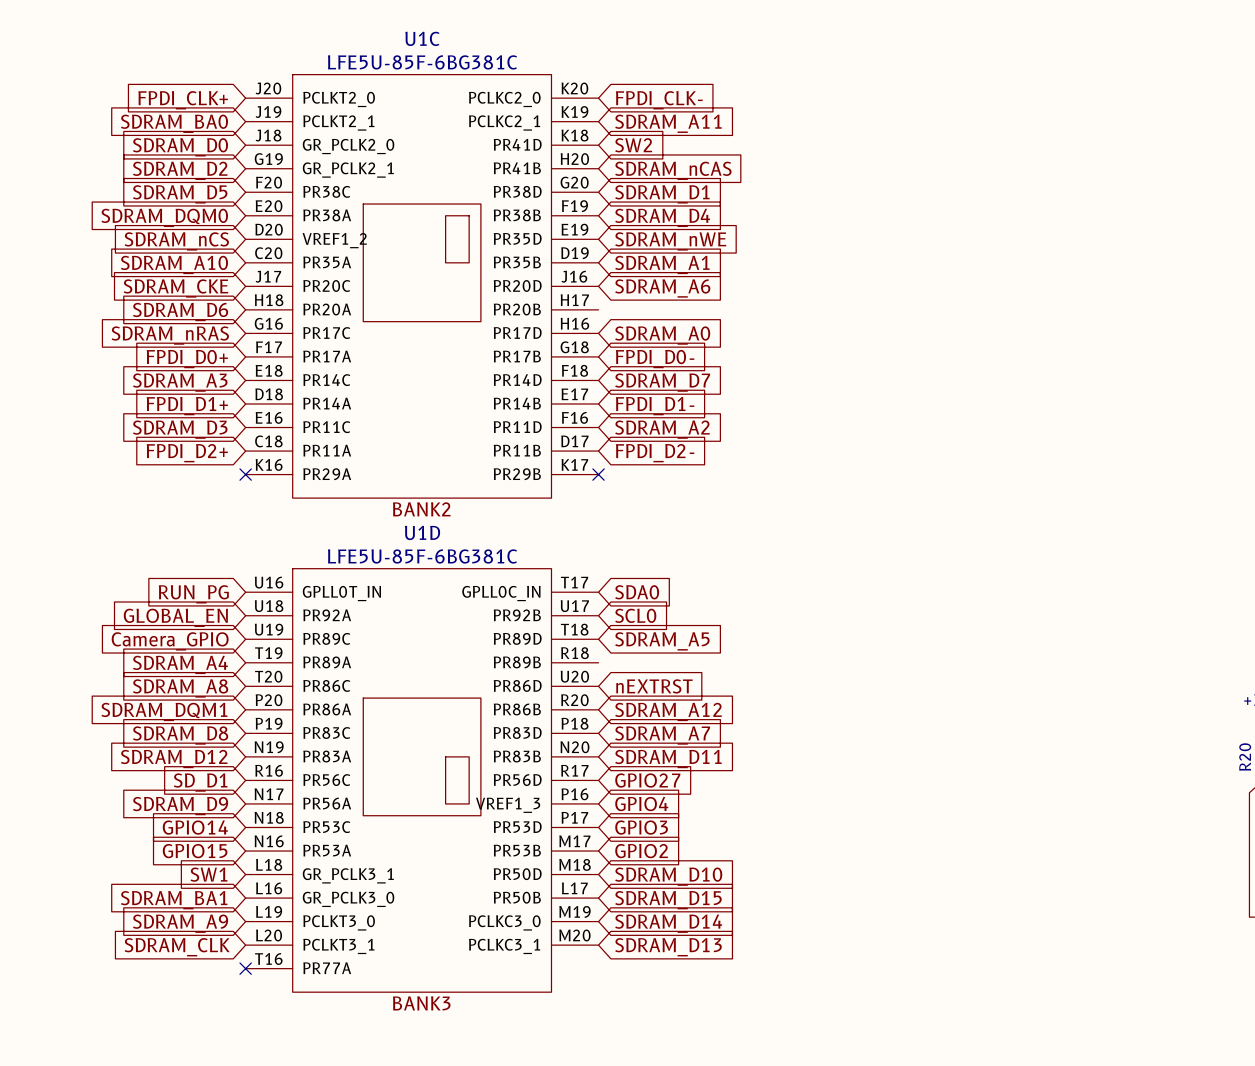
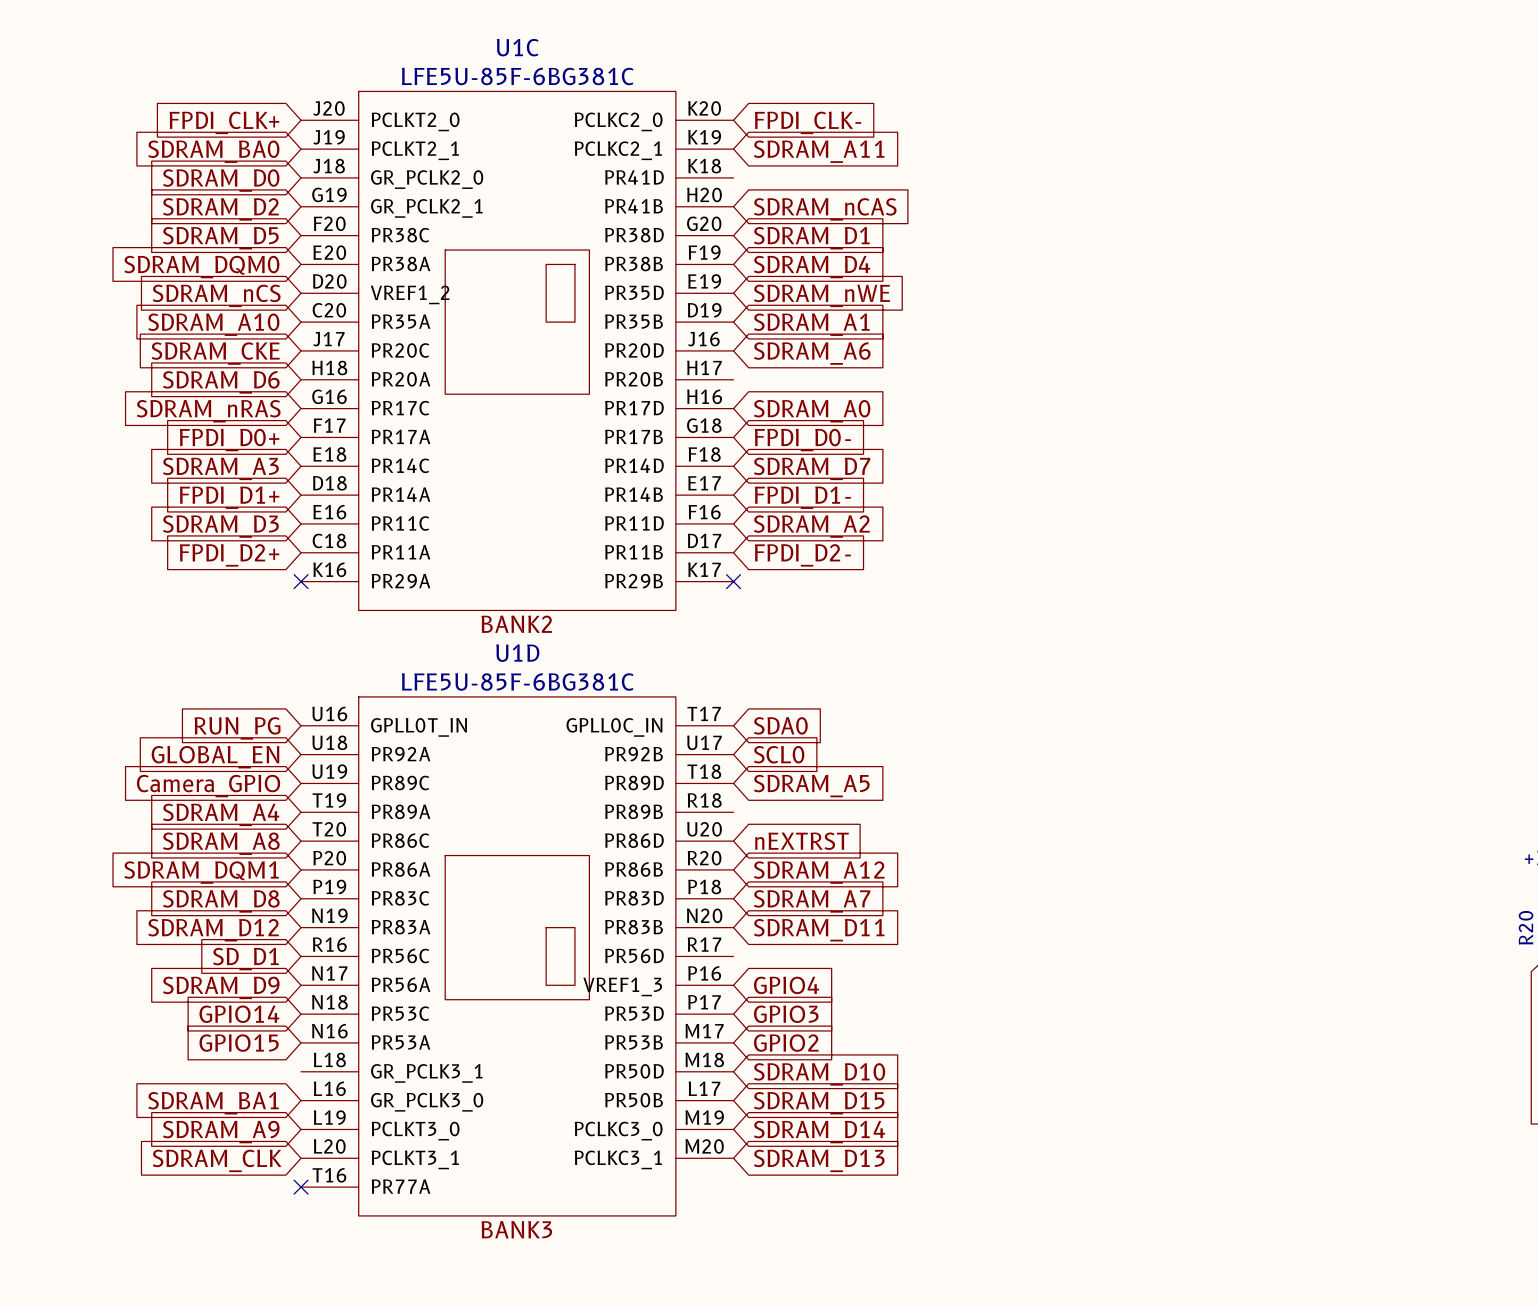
global label: SW2 (633, 145) -> none
global label: GPIO27 (647, 780) -> none
global label: SW1 (209, 874) -> none

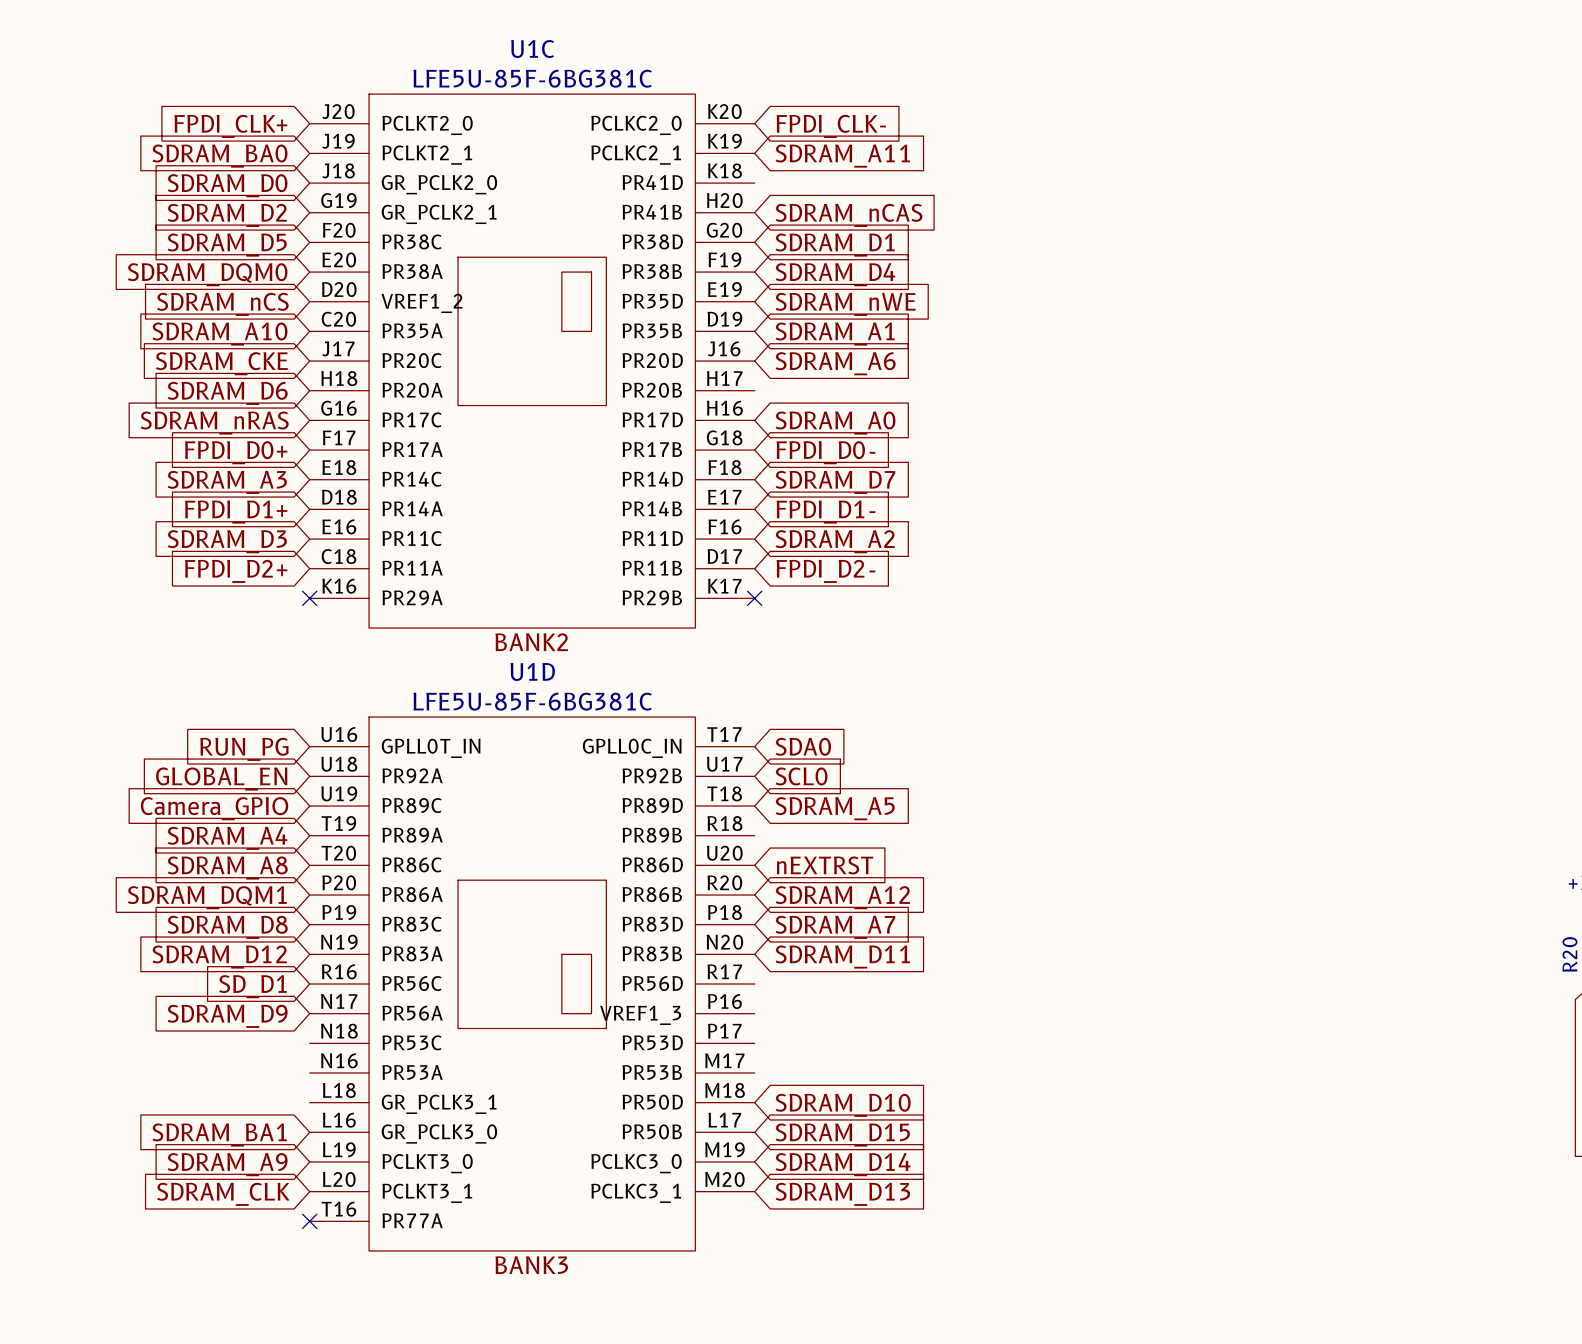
global label: GPIO4 (786, 985) -> none
global label: GPIO14 (239, 1014) -> none
global label: GPIO3 (786, 1014) -> none
global label: GPIO15 (239, 1043) -> none
global label: GPIO2 (786, 1043) -> none

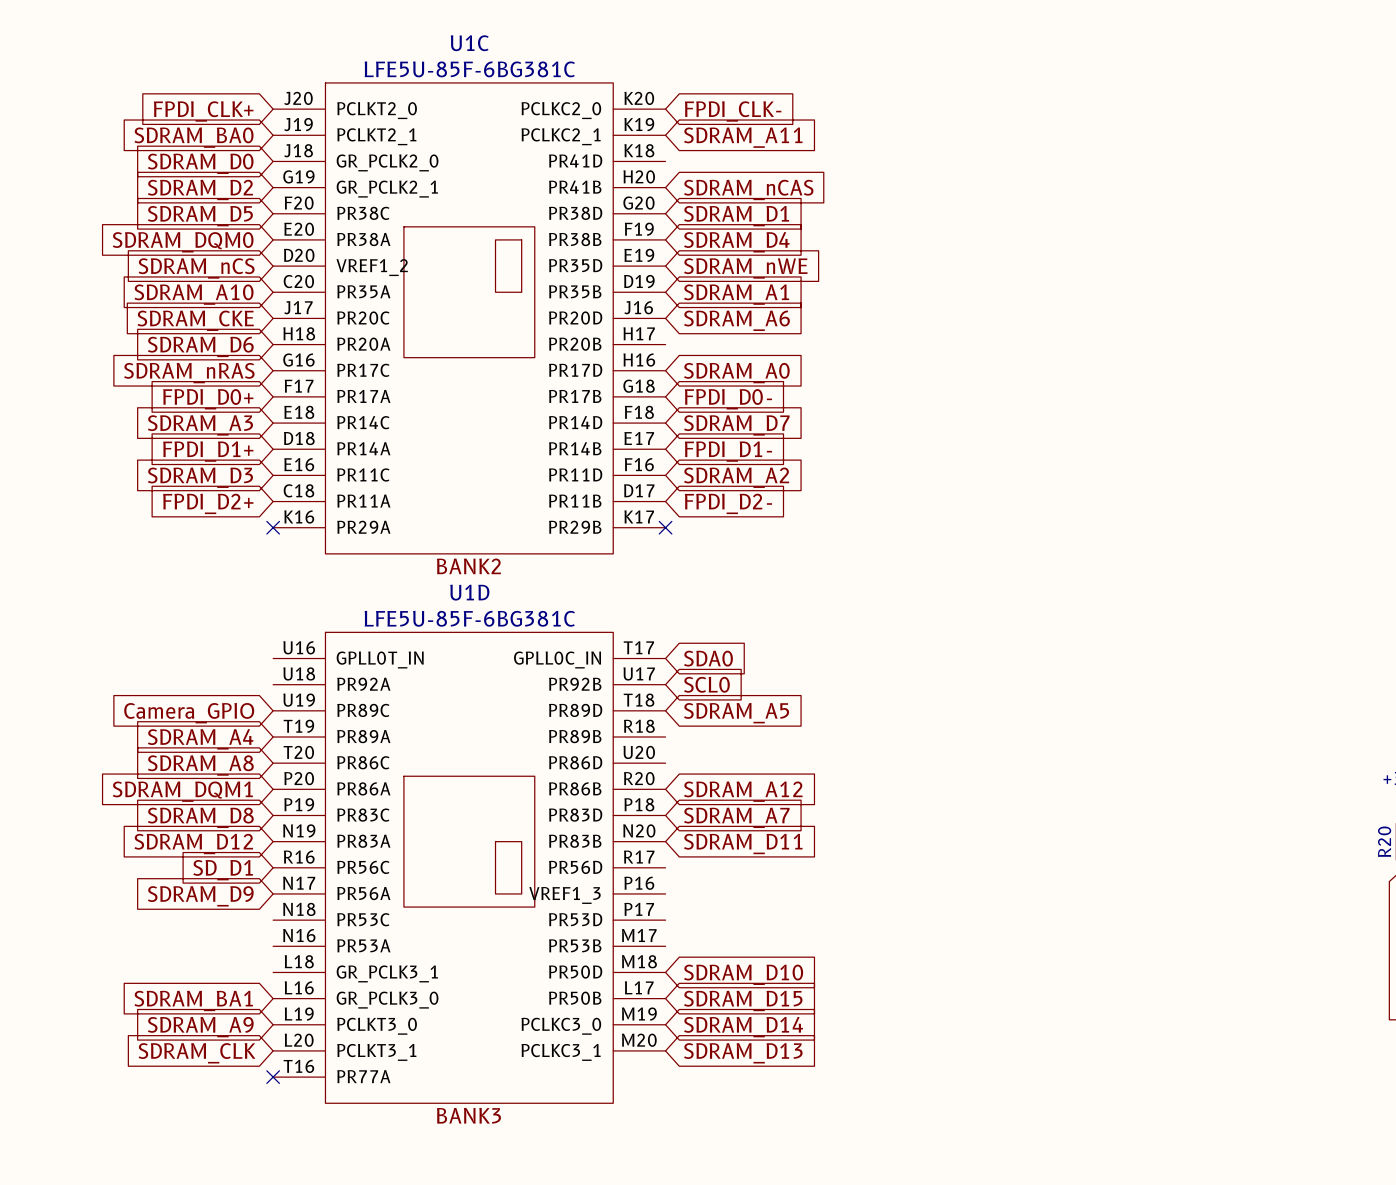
global label: RUN_PG (244, 749) -> none
global label: GLOBAL_EN (221, 779) -> none
global label: nEXTRST (825, 865) -> none

